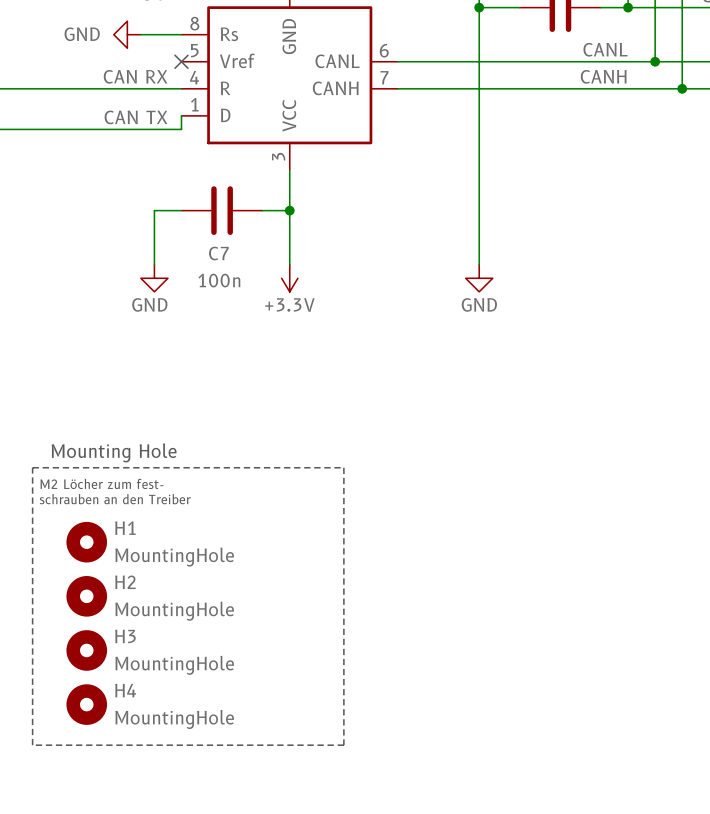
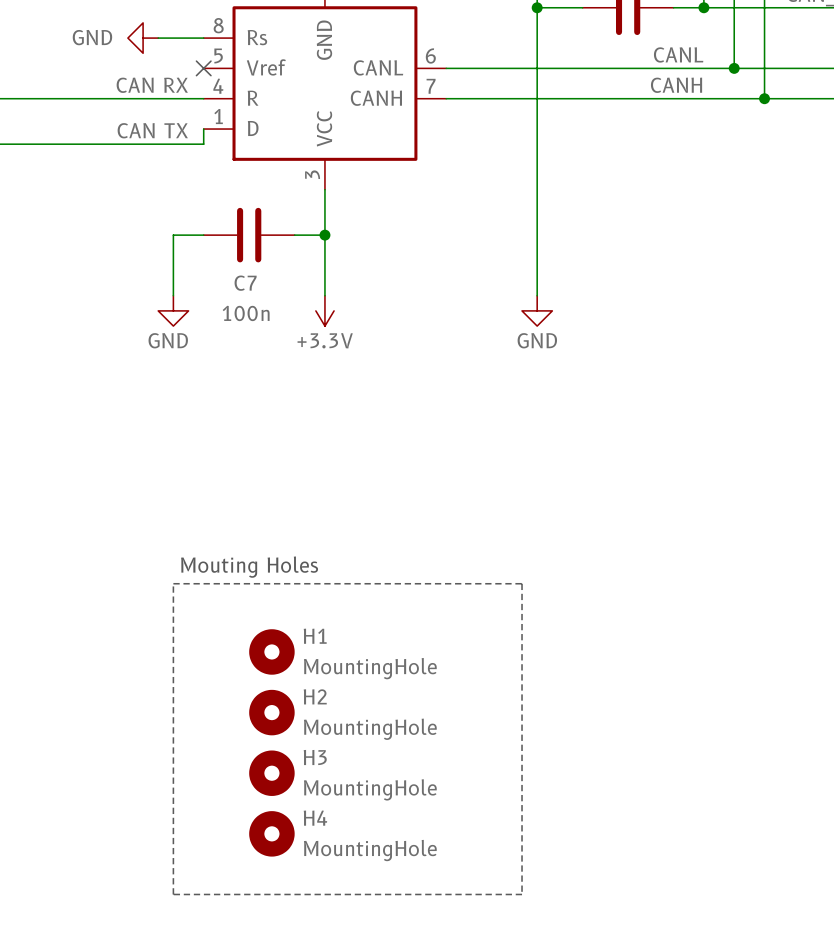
text: Mounting Hole (114, 452) -> none
line: (32, 467) (343, 467) (343, 745) (32, 745) (32, 467) -> (173, 583) (522, 583) (522, 894) (173, 894) (173, 583)
text: M2 Löcher zum fest- (101, 483) -> none
text: schrauben an den Treiber (115, 499) -> none
text: none -> Mouting Holes (249, 567)
H1 position: (86, 542) -> (271, 651)
H2 position: (86, 596) -> (271, 712)
H3 position: (86, 650) -> (271, 773)
H4 position: (86, 704) -> (271, 833)

